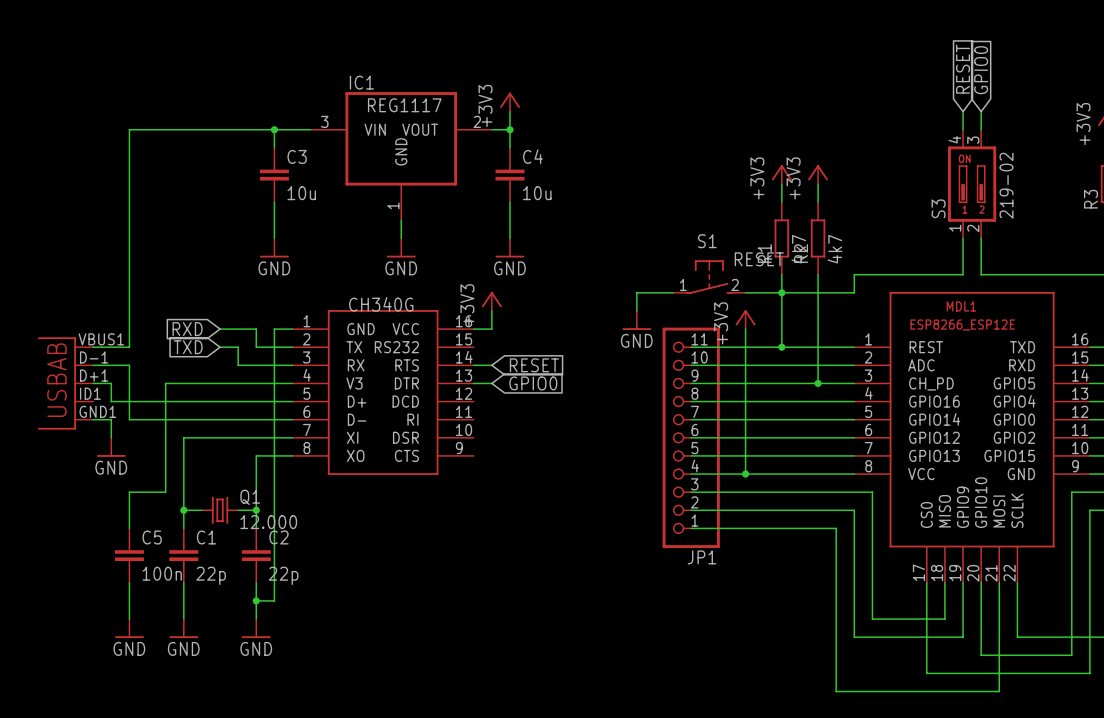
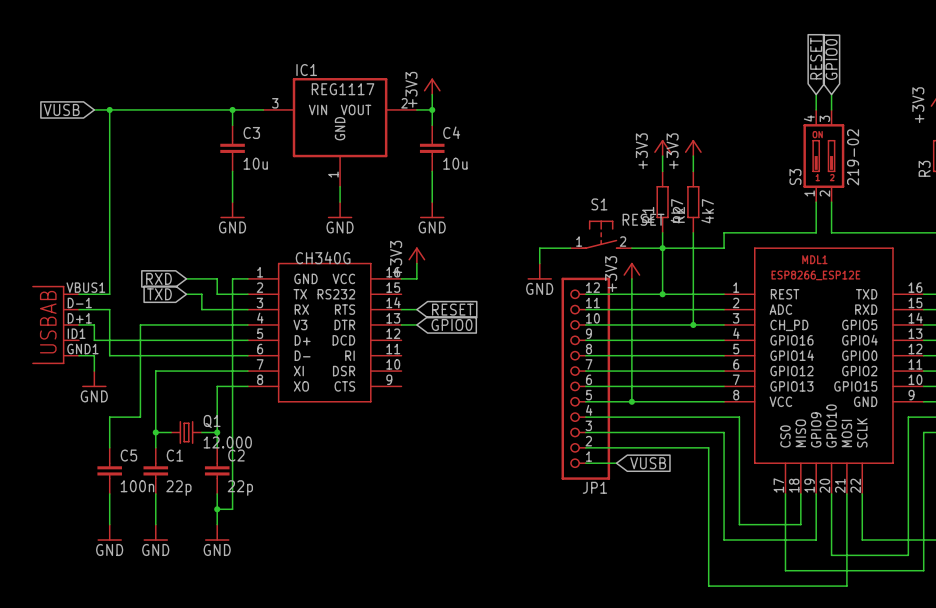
global label: none -> VUSB (61, 109)
wire: none -> (94, 109) (109, 109)
junction: none -> (109, 109)
JP1 symbol: [662, 327, 720, 548] -> [561, 277, 611, 480]
global label: none -> VUSB (648, 463)

